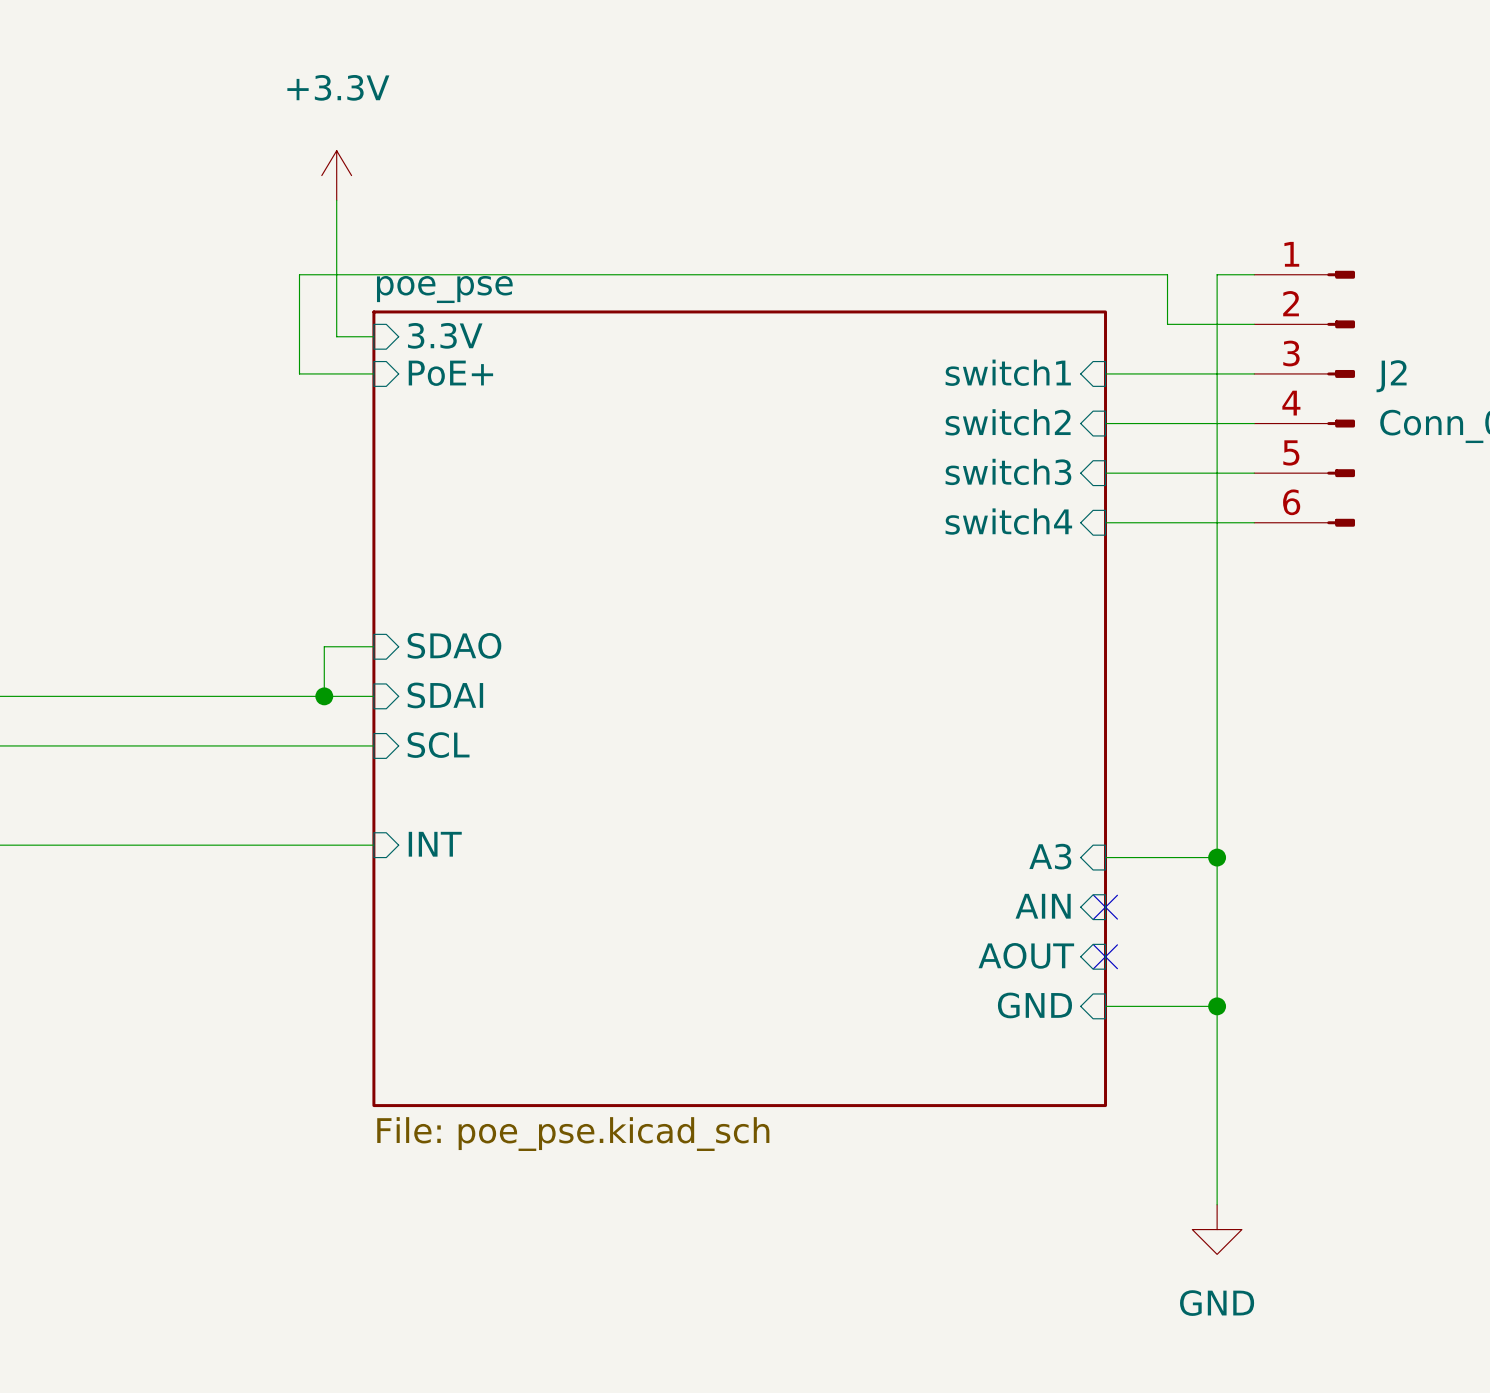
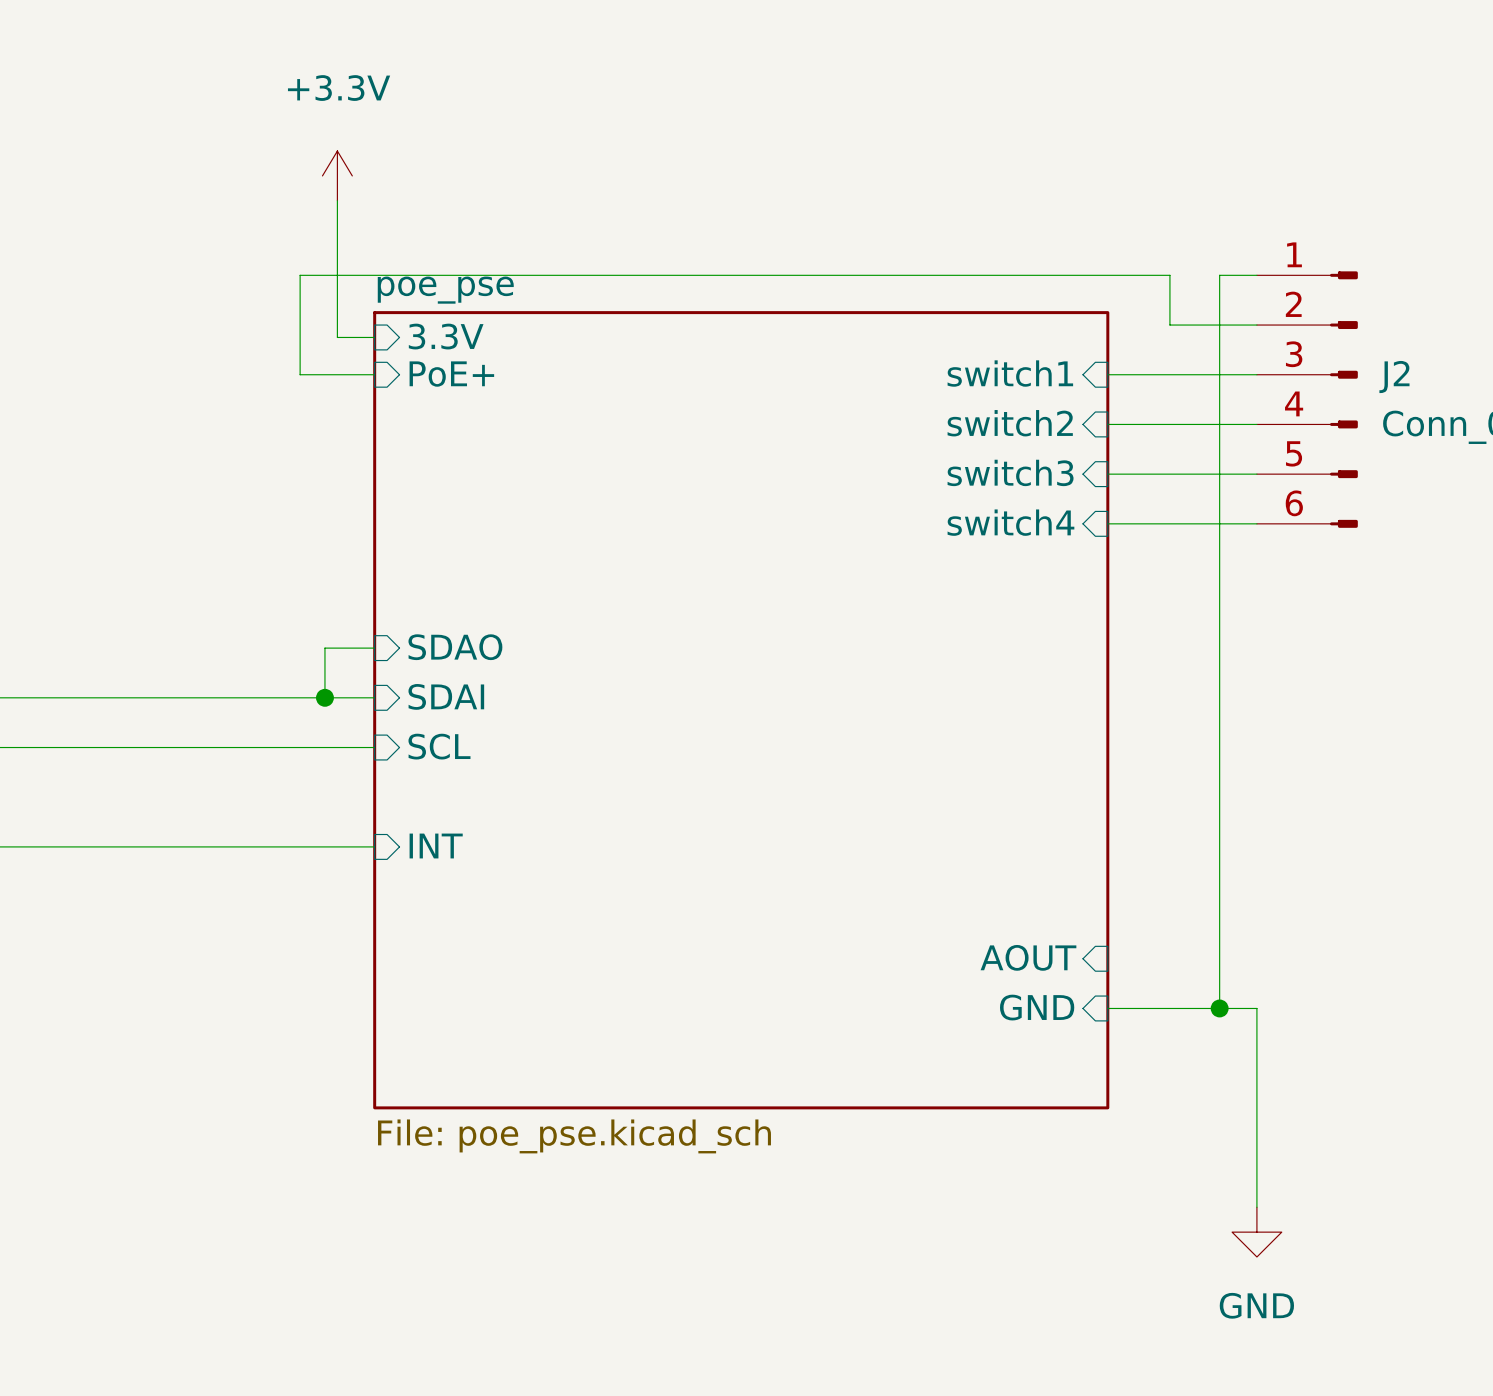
sheet pin: A3 (1050, 856) -> none
wire: (1105, 857) (1217, 857) -> none
junction: (1217, 857) -> none
sheet pin: AIN (1043, 906) -> none
no-connect mark: (1105, 907) -> none
no-connect mark: (1105, 956) -> none
wire: (1217, 1006) (1217, 1204) -> (1219, 1008) (1256, 1008) (1256, 1207)
power symbol position: GND (1217, 1229) -> GND (1256, 1232)

